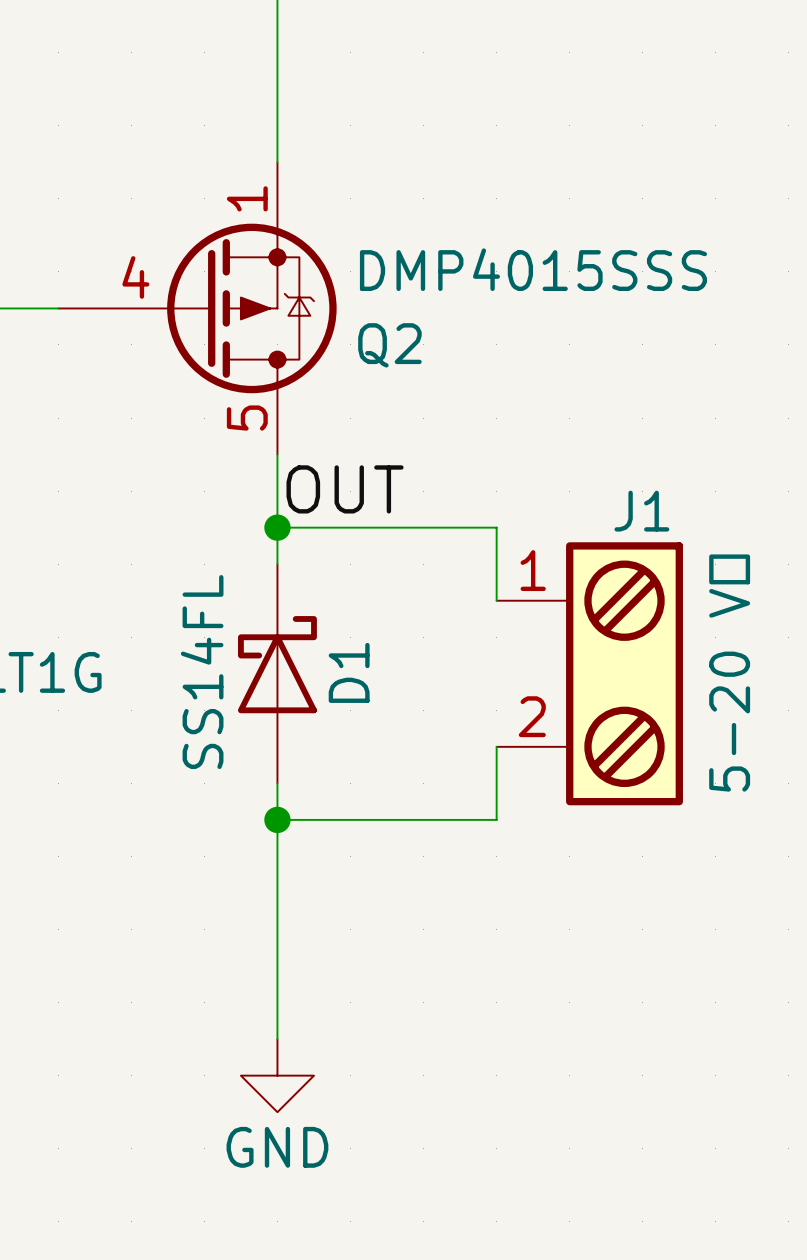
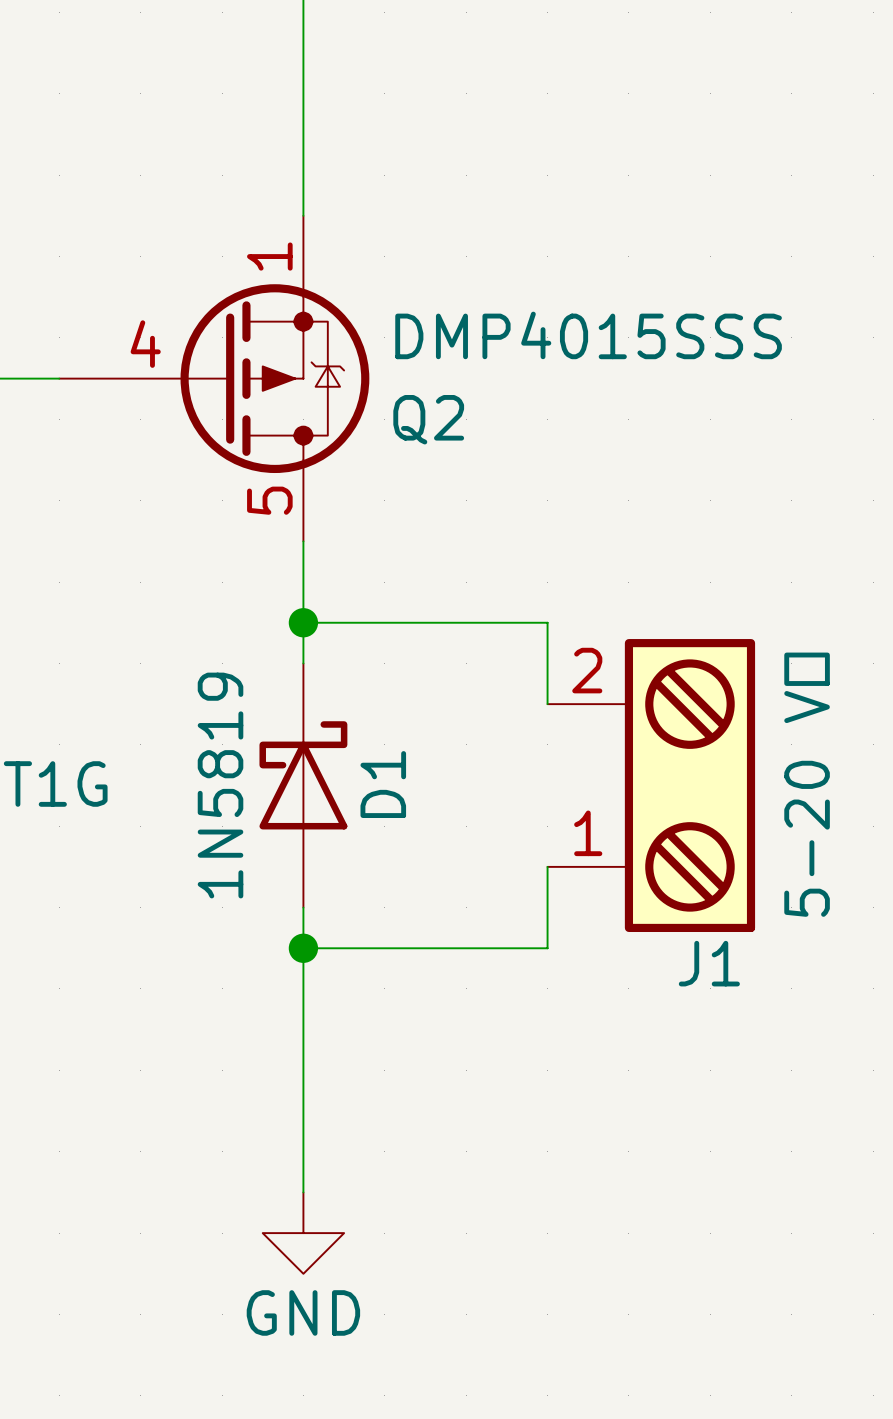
label: OUT (345, 489) -> none
D1 value: SS14FL (202, 672) -> 1N5819 (220, 785)
J1 flip: as is (624, 673) -> up-down (689, 785)

